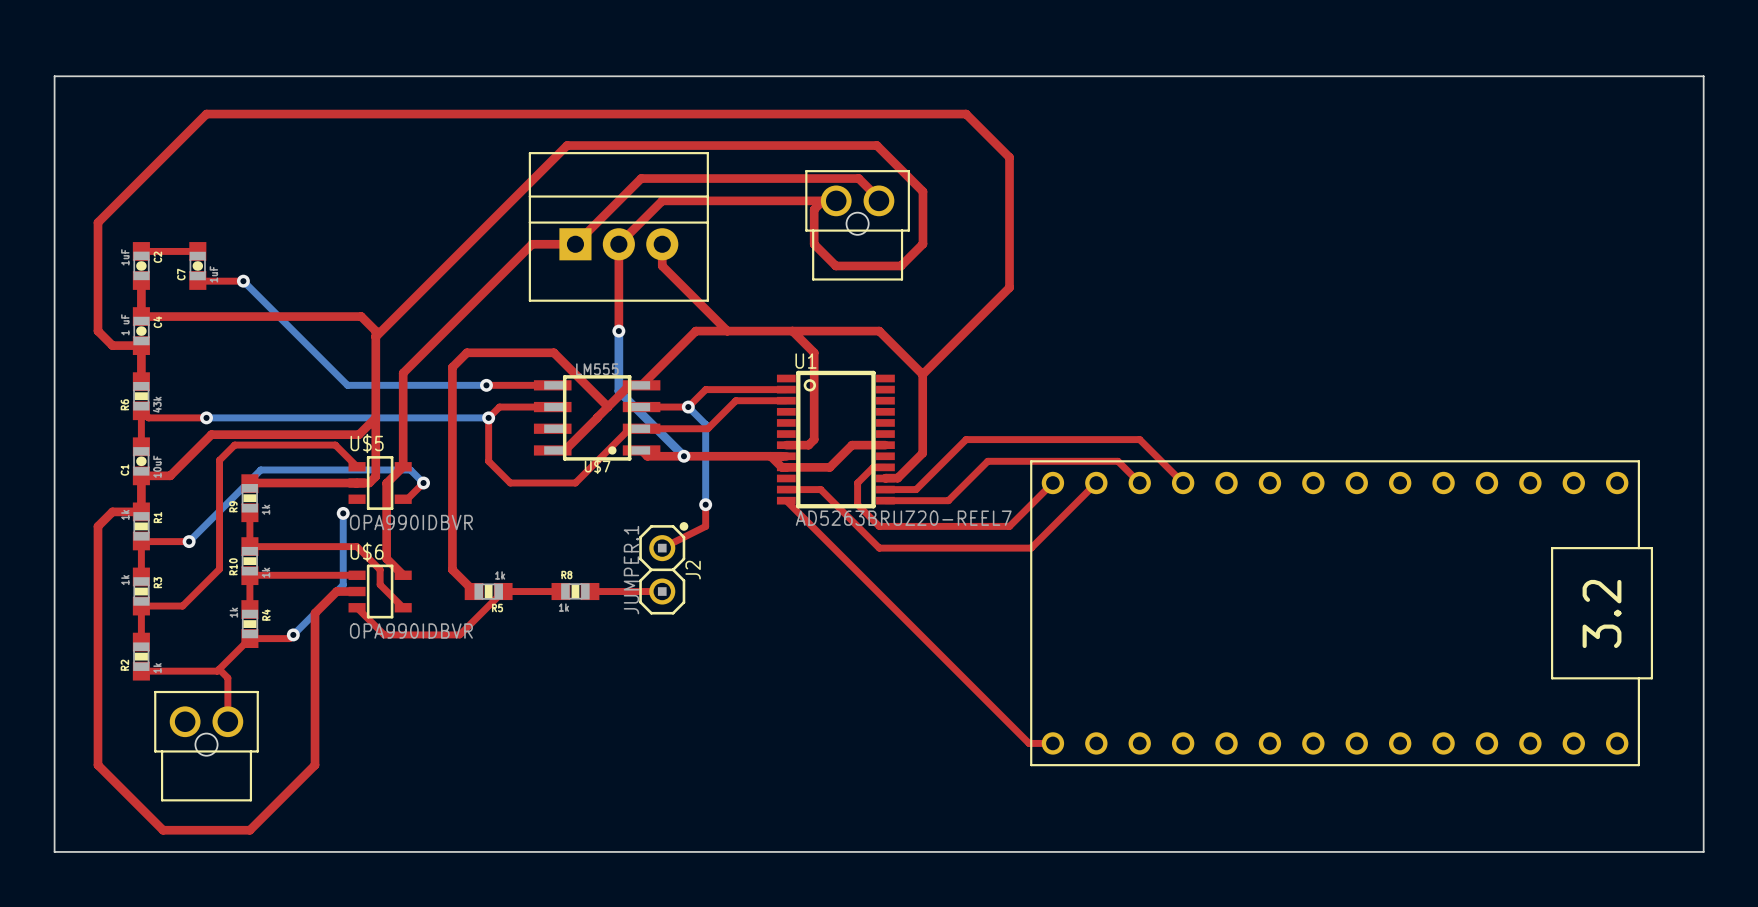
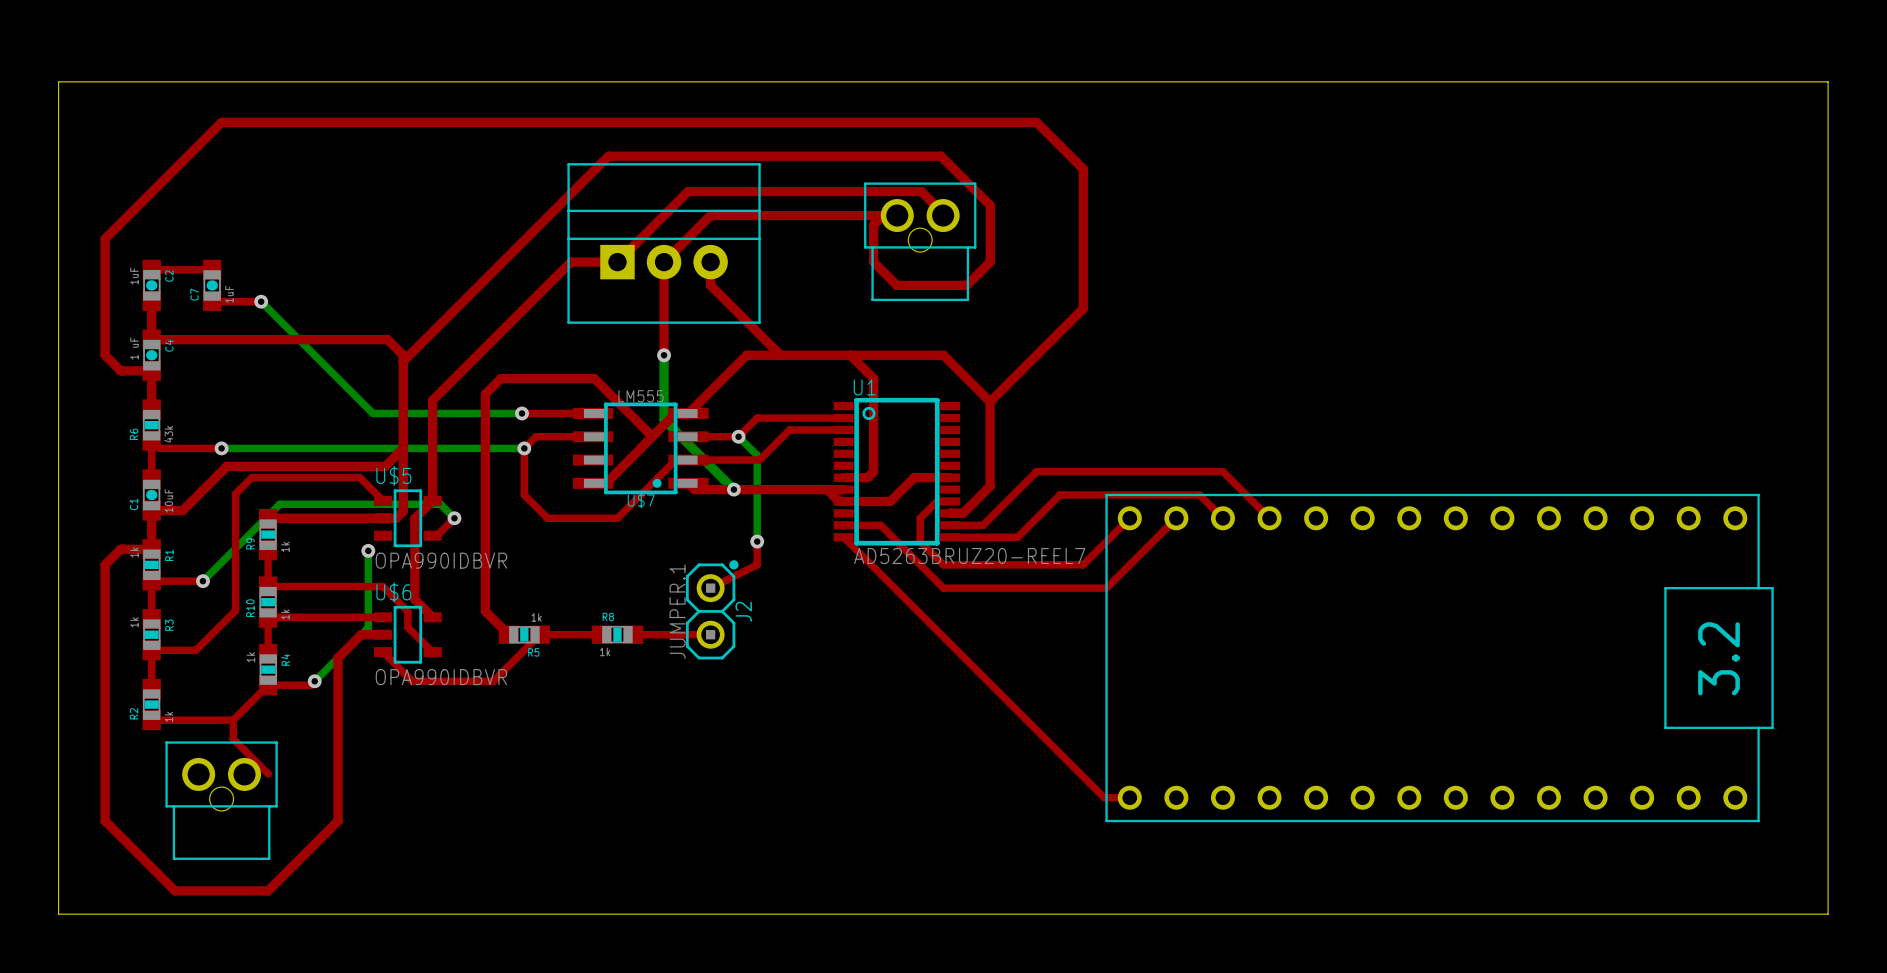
top track: (219, 669) (227, 677) (228, 721) -> none
top track: none -> (233, 720) (233, 738) (268, 773)

